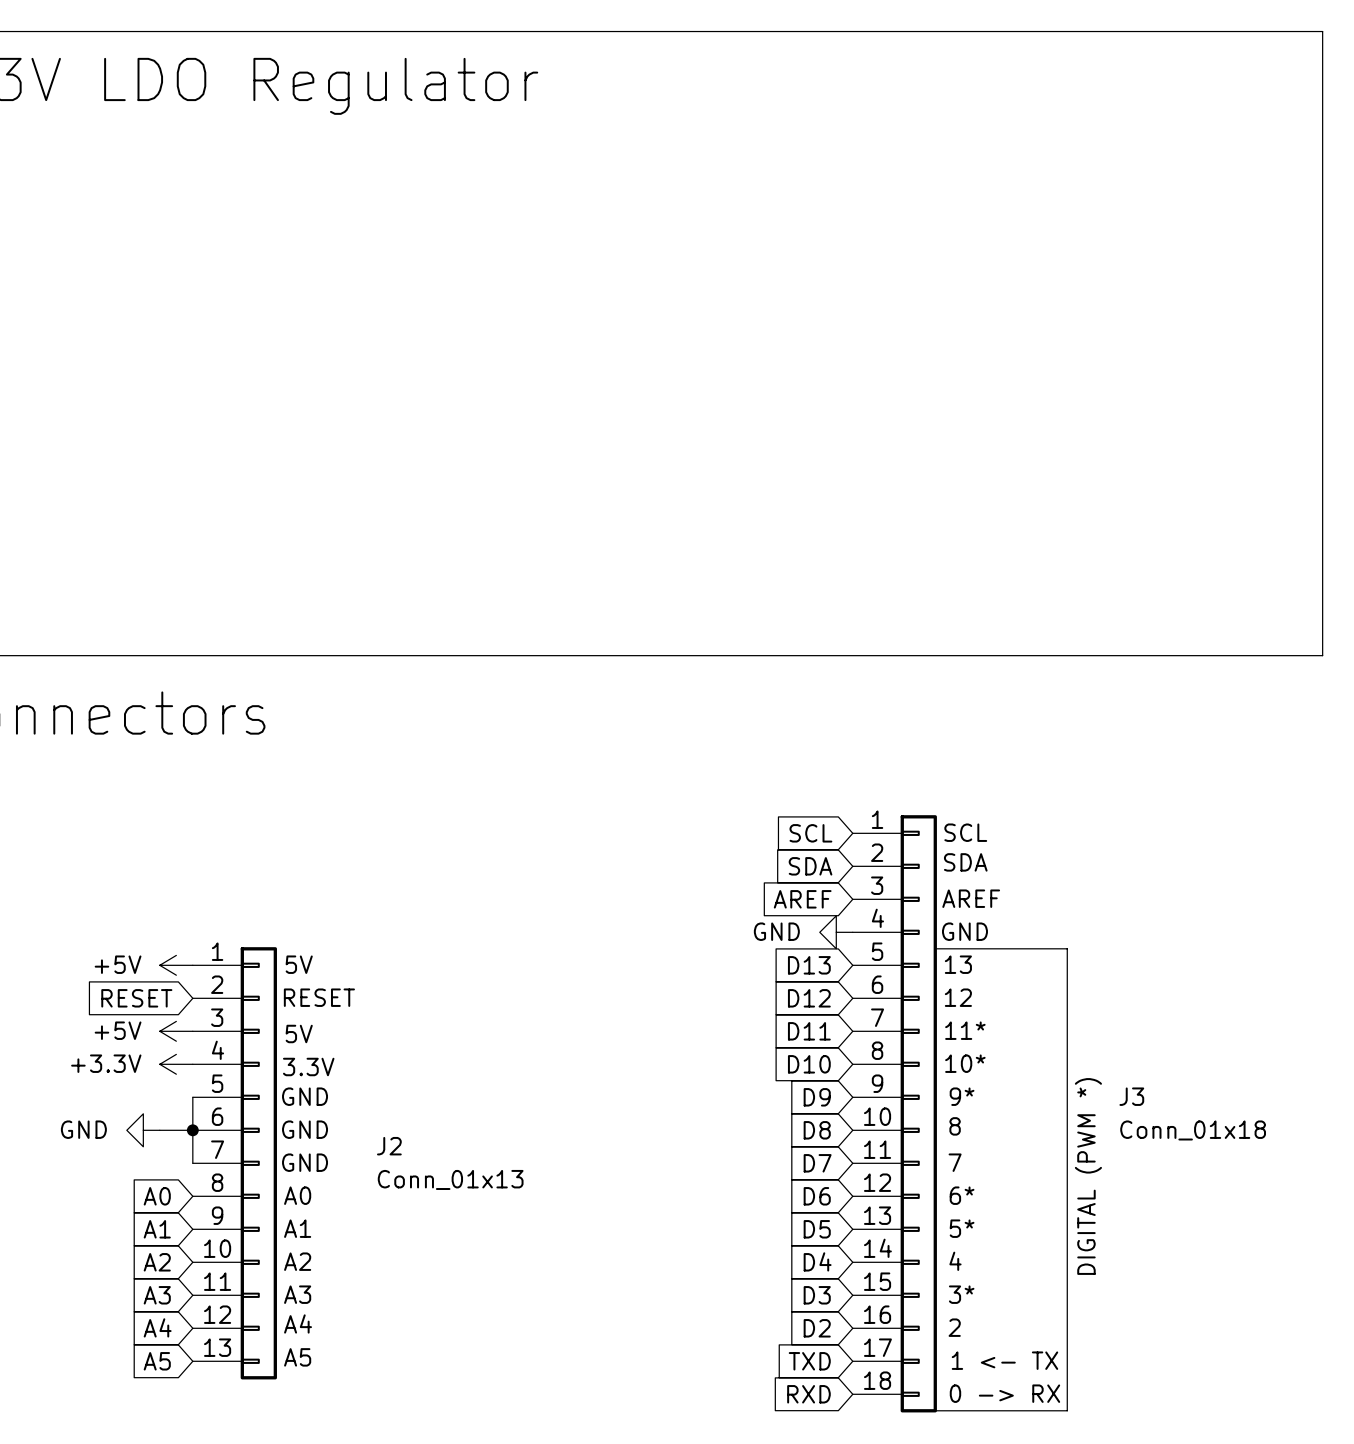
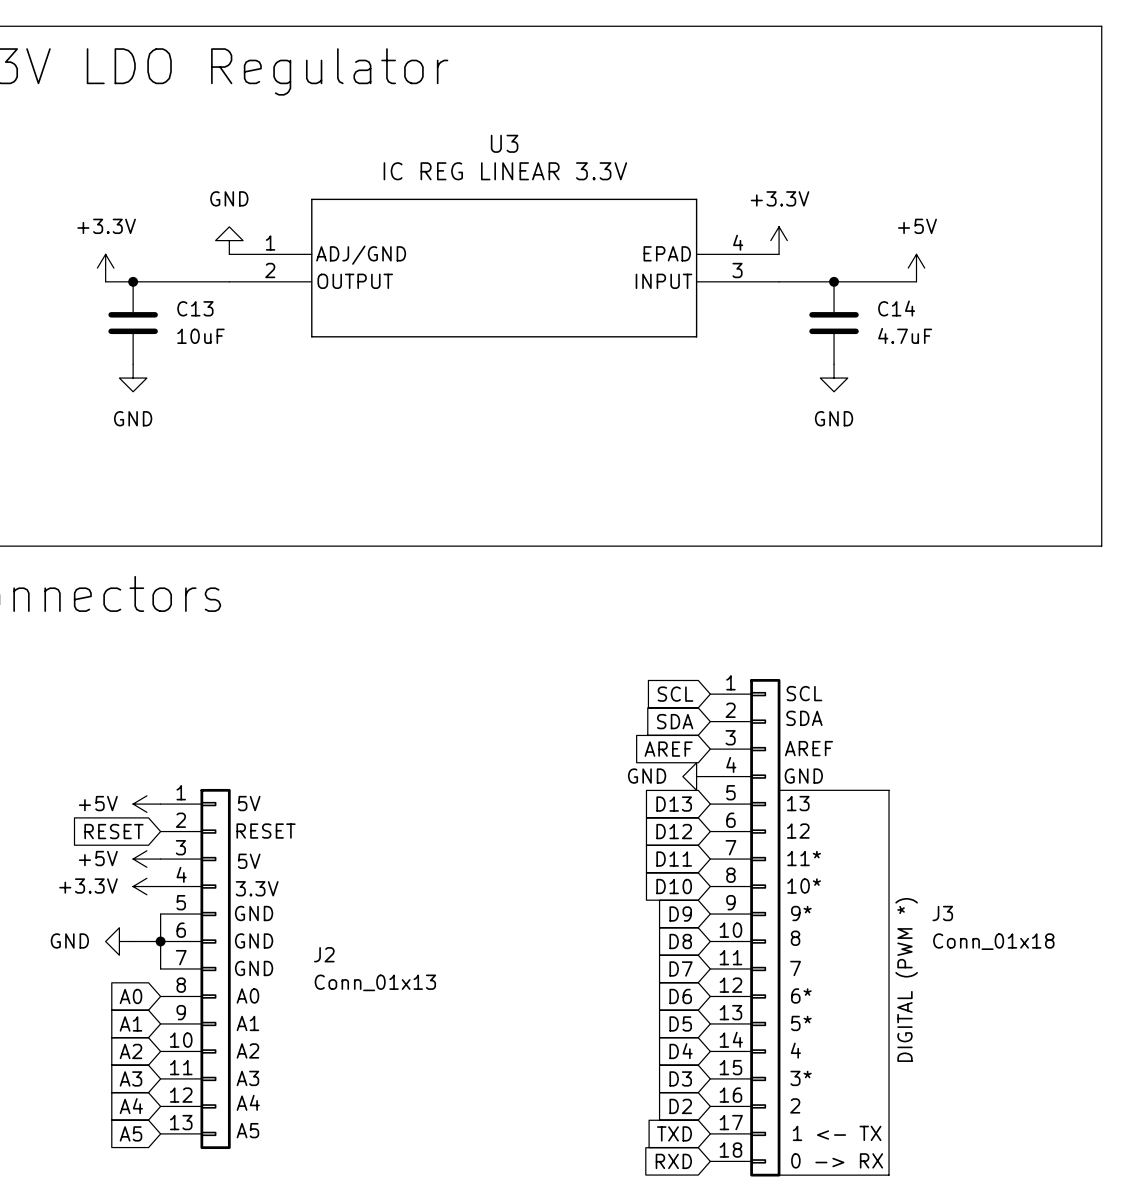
power symbol: none -> GND (229, 240)
power symbol: none -> +3.3V (779, 240)
power symbol: none -> +3.3V (105, 268)
U3: none -> IC REG LINEAR 3.3V (504, 268)
power symbol: none -> +5V (916, 268)
wire: none -> (105, 281) (229, 281)
junction: none -> (133, 281)
wire: none -> (779, 281) (916, 281)
junction: none -> (834, 281)
C13: none -> 10uF (133, 323)
C14: none -> 4.7uF (834, 323)
power symbol: none -> GND (133, 378)
power symbol: none -> GND (834, 378)

